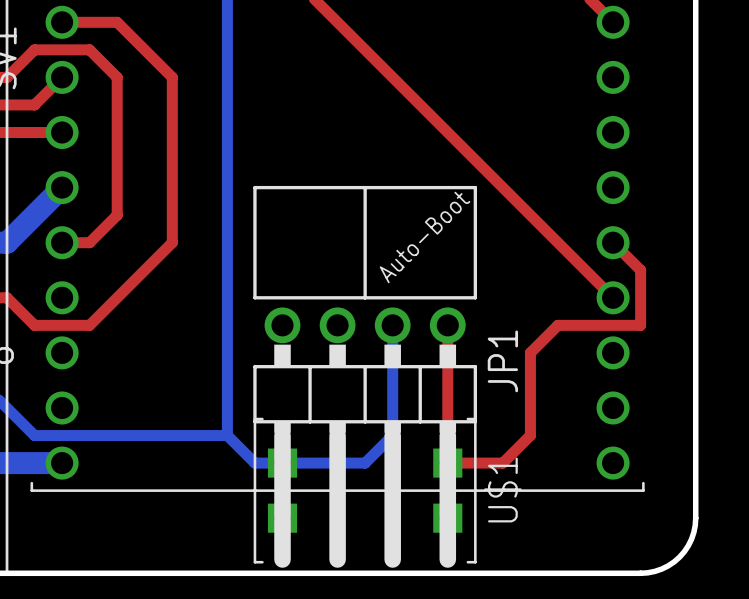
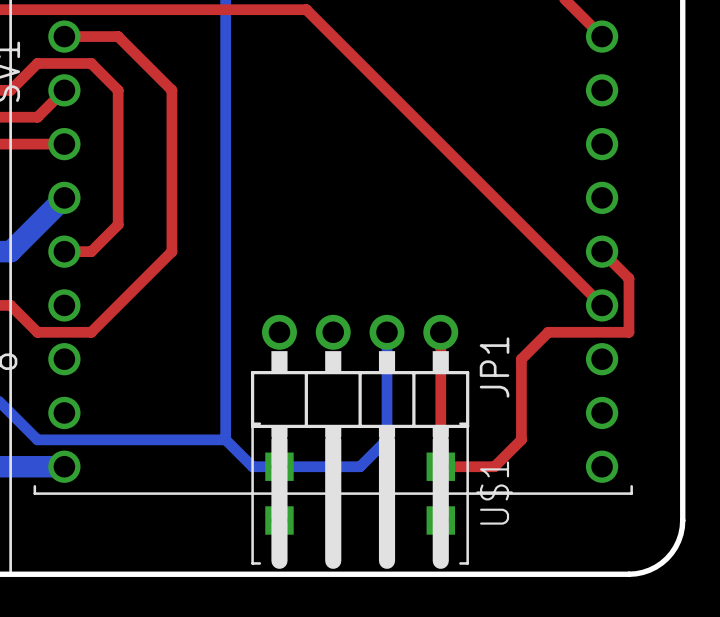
line: (254, 187) (475, 187) (475, 297) (254, 297) (254, 187) -> none
line: (365, 187) (365, 297) -> none
text: Auto-Boot (425, 237) -> none

